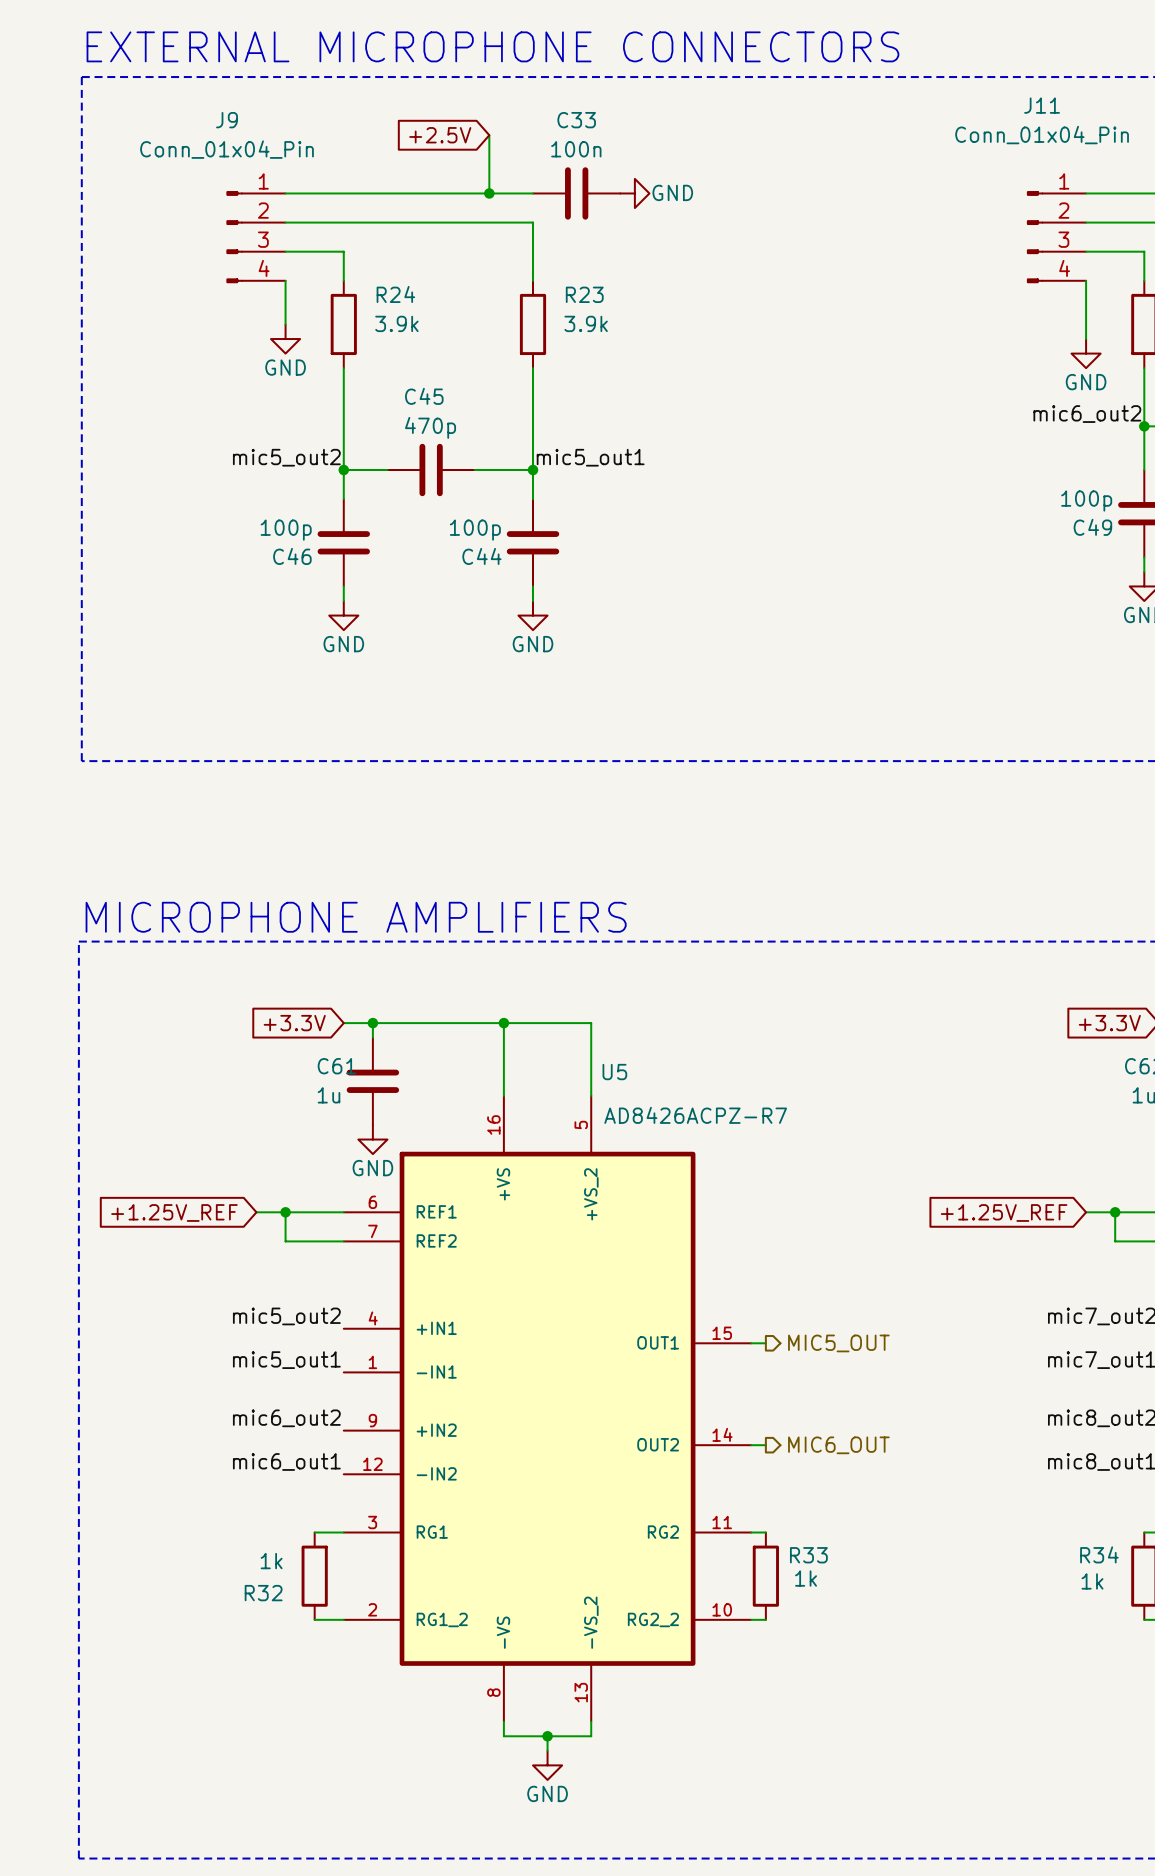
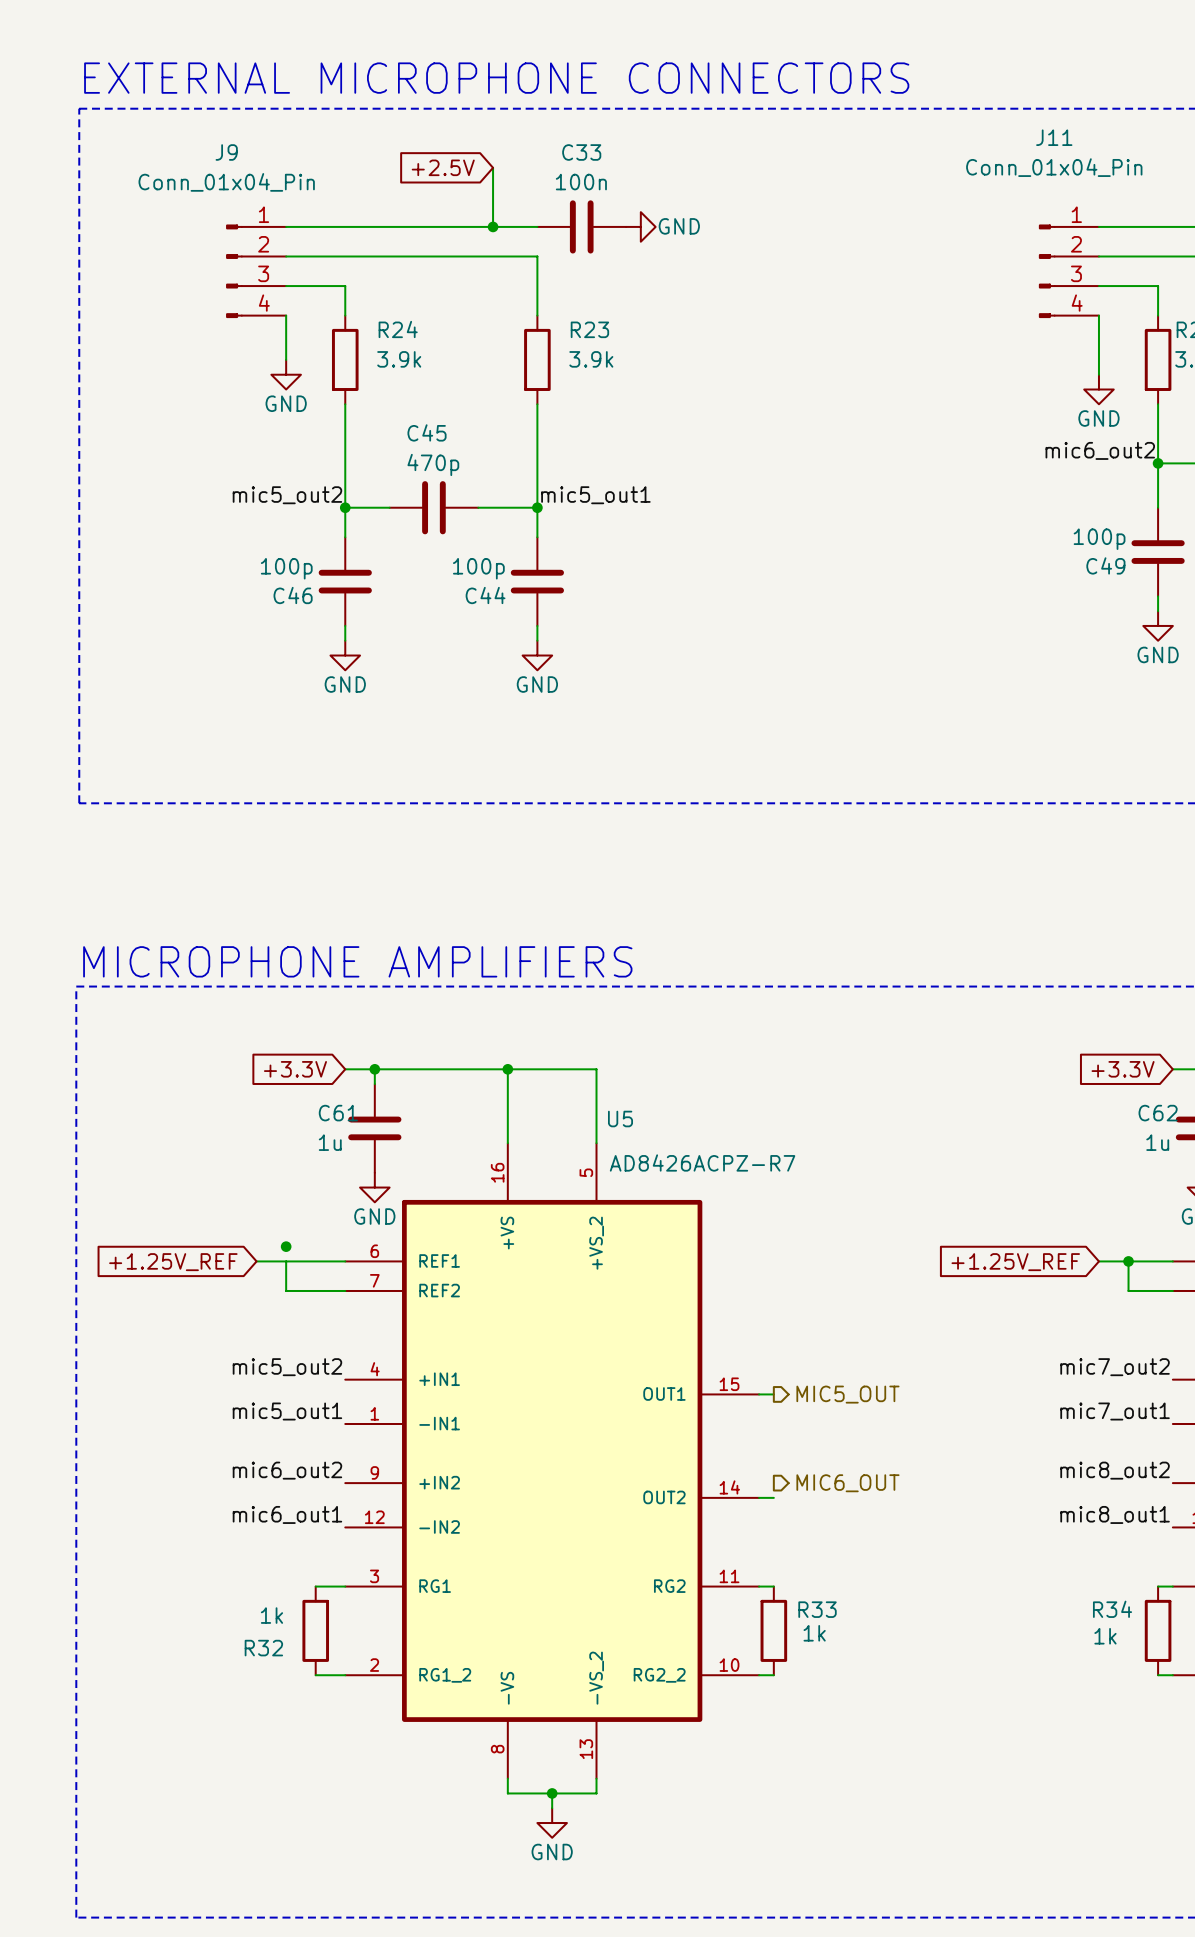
junction position: (285, 1212) -> (286, 1246)
hierarchical label position: MIC6_OUT (838, 1445) -> MIC6_OUT (847, 1483)

